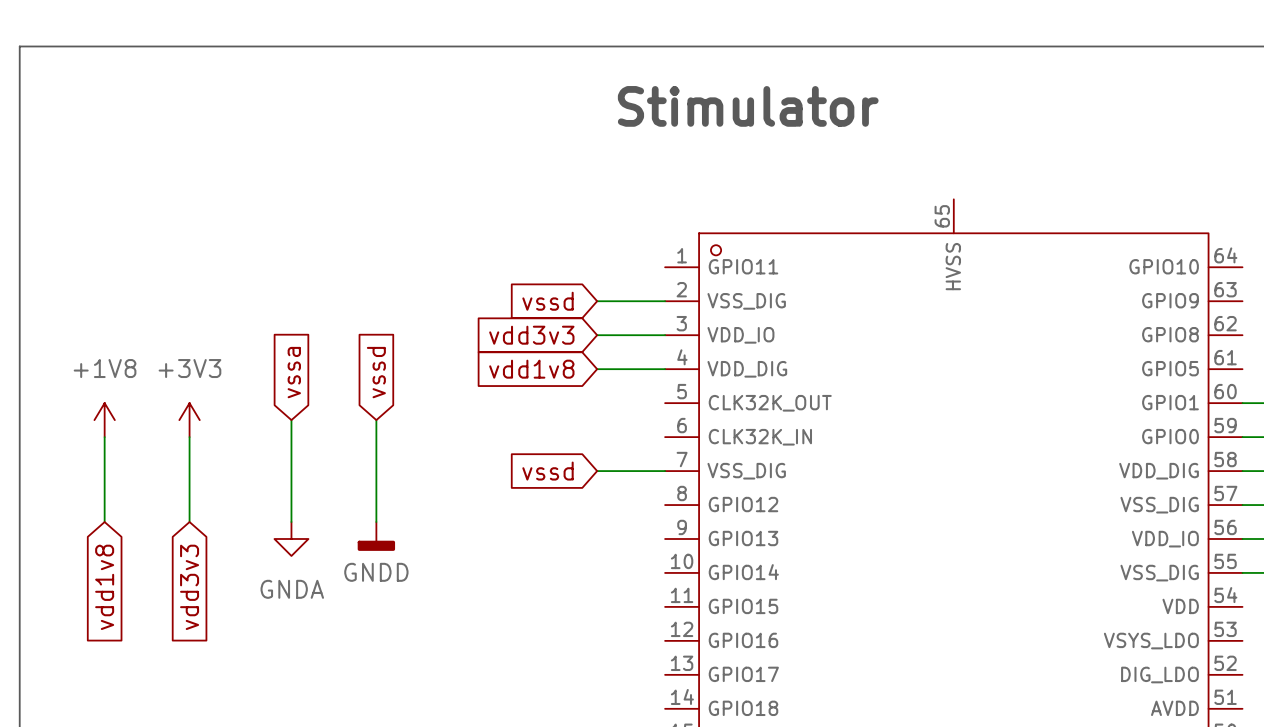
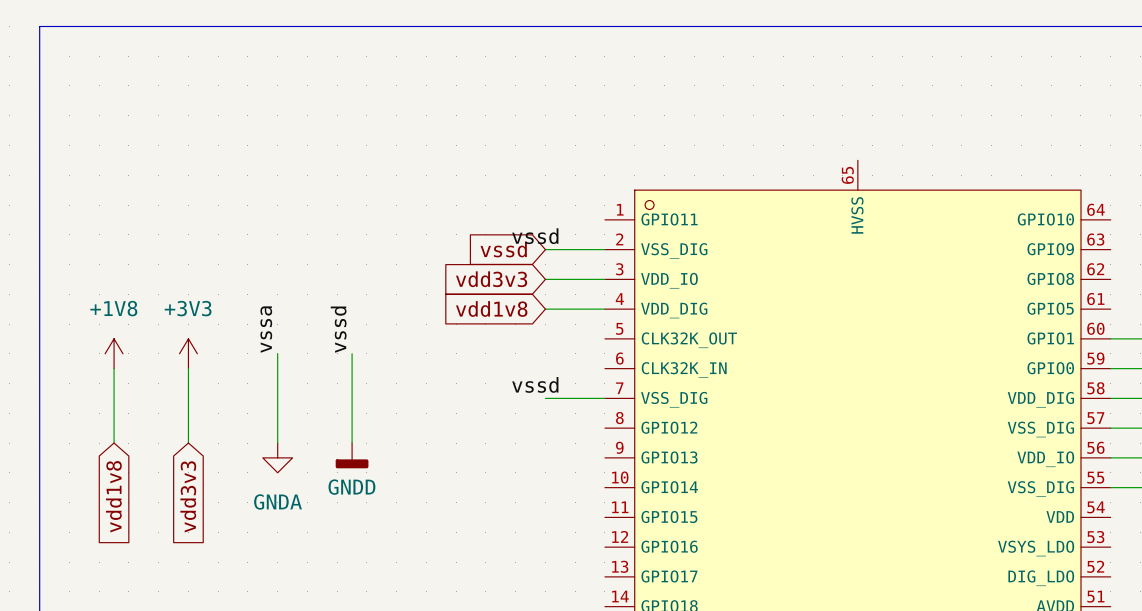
text: Stimulator (748, 106) -> none
label: none -> vssd (535, 236)
global label: vssa (294, 372) -> none
global label: vssd (376, 372) -> none
label: none -> vssa (266, 329)
label: none -> vssd (338, 329)
label: none -> vssd (535, 384)
global label: vssd (548, 471) -> none

